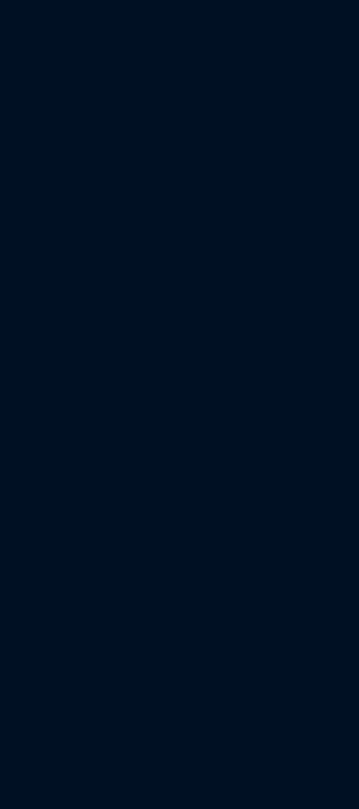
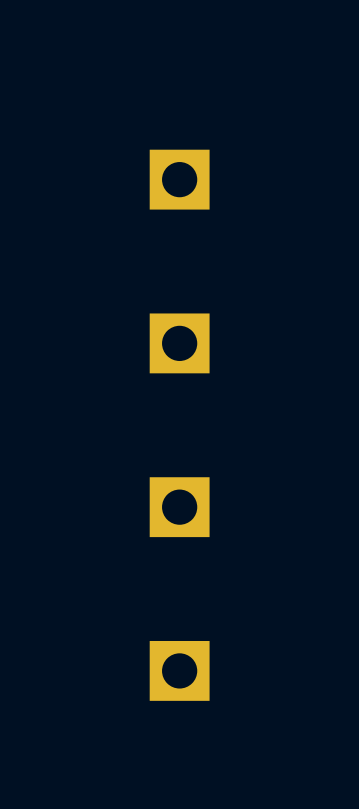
part: none -> (179, 179)
part: none -> (179, 343)
part: none -> (179, 507)
part: none -> (179, 670)

